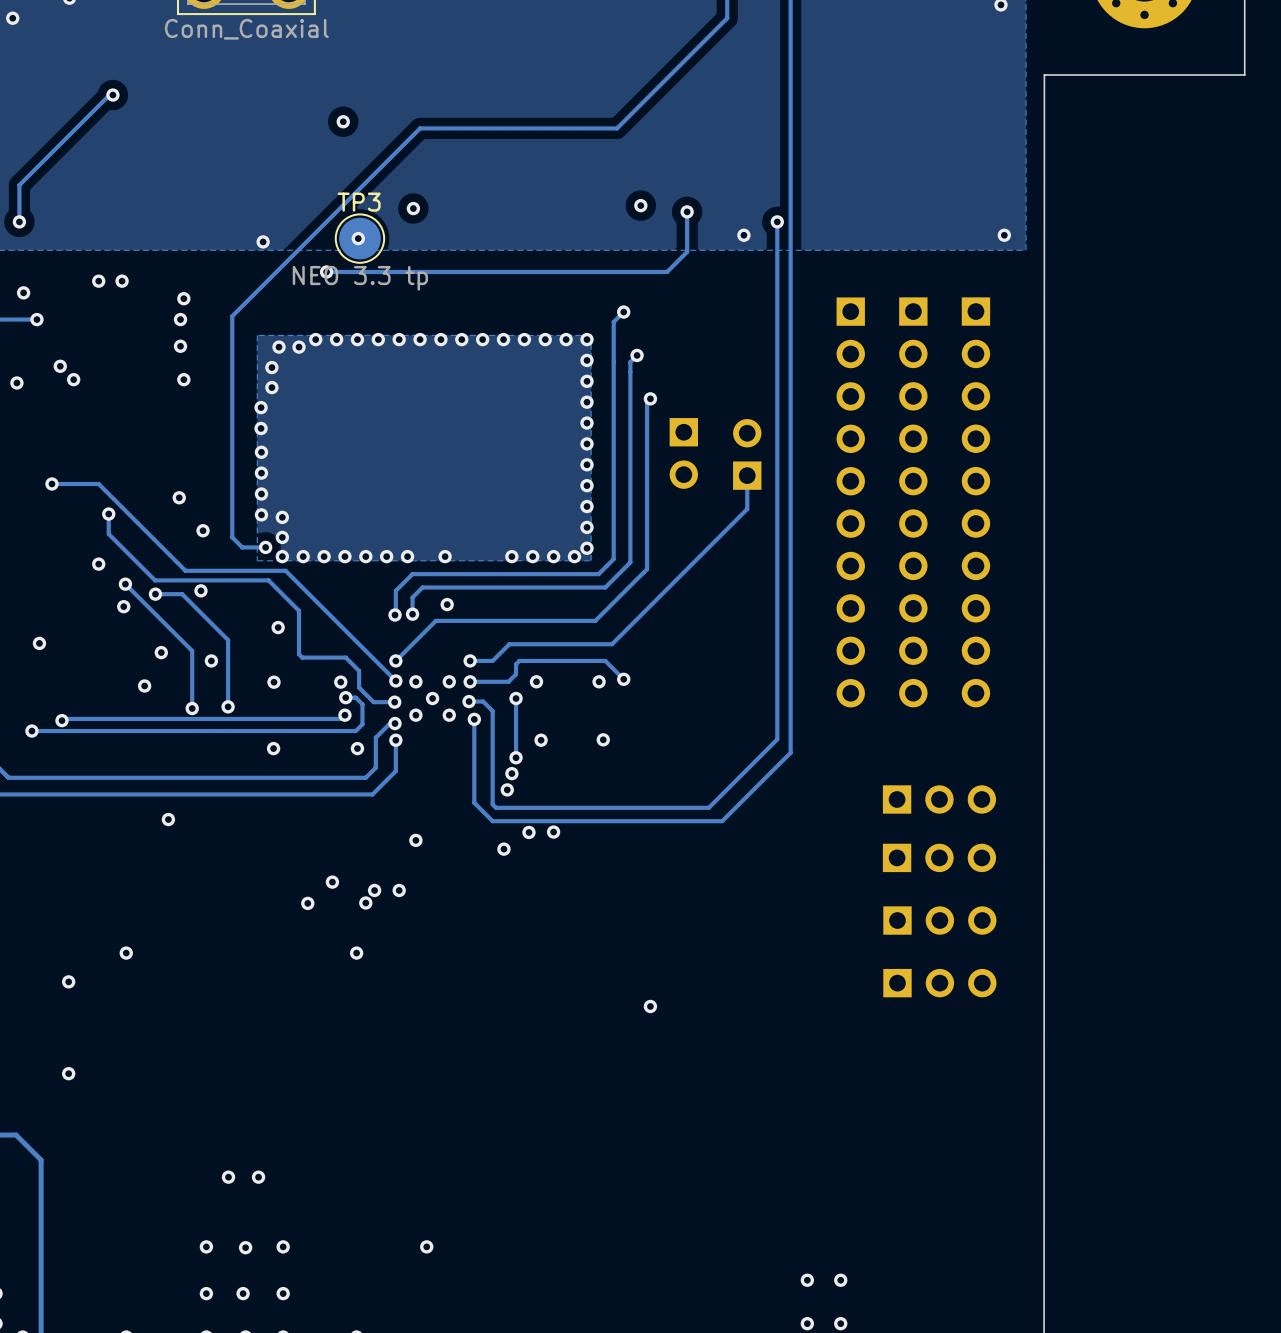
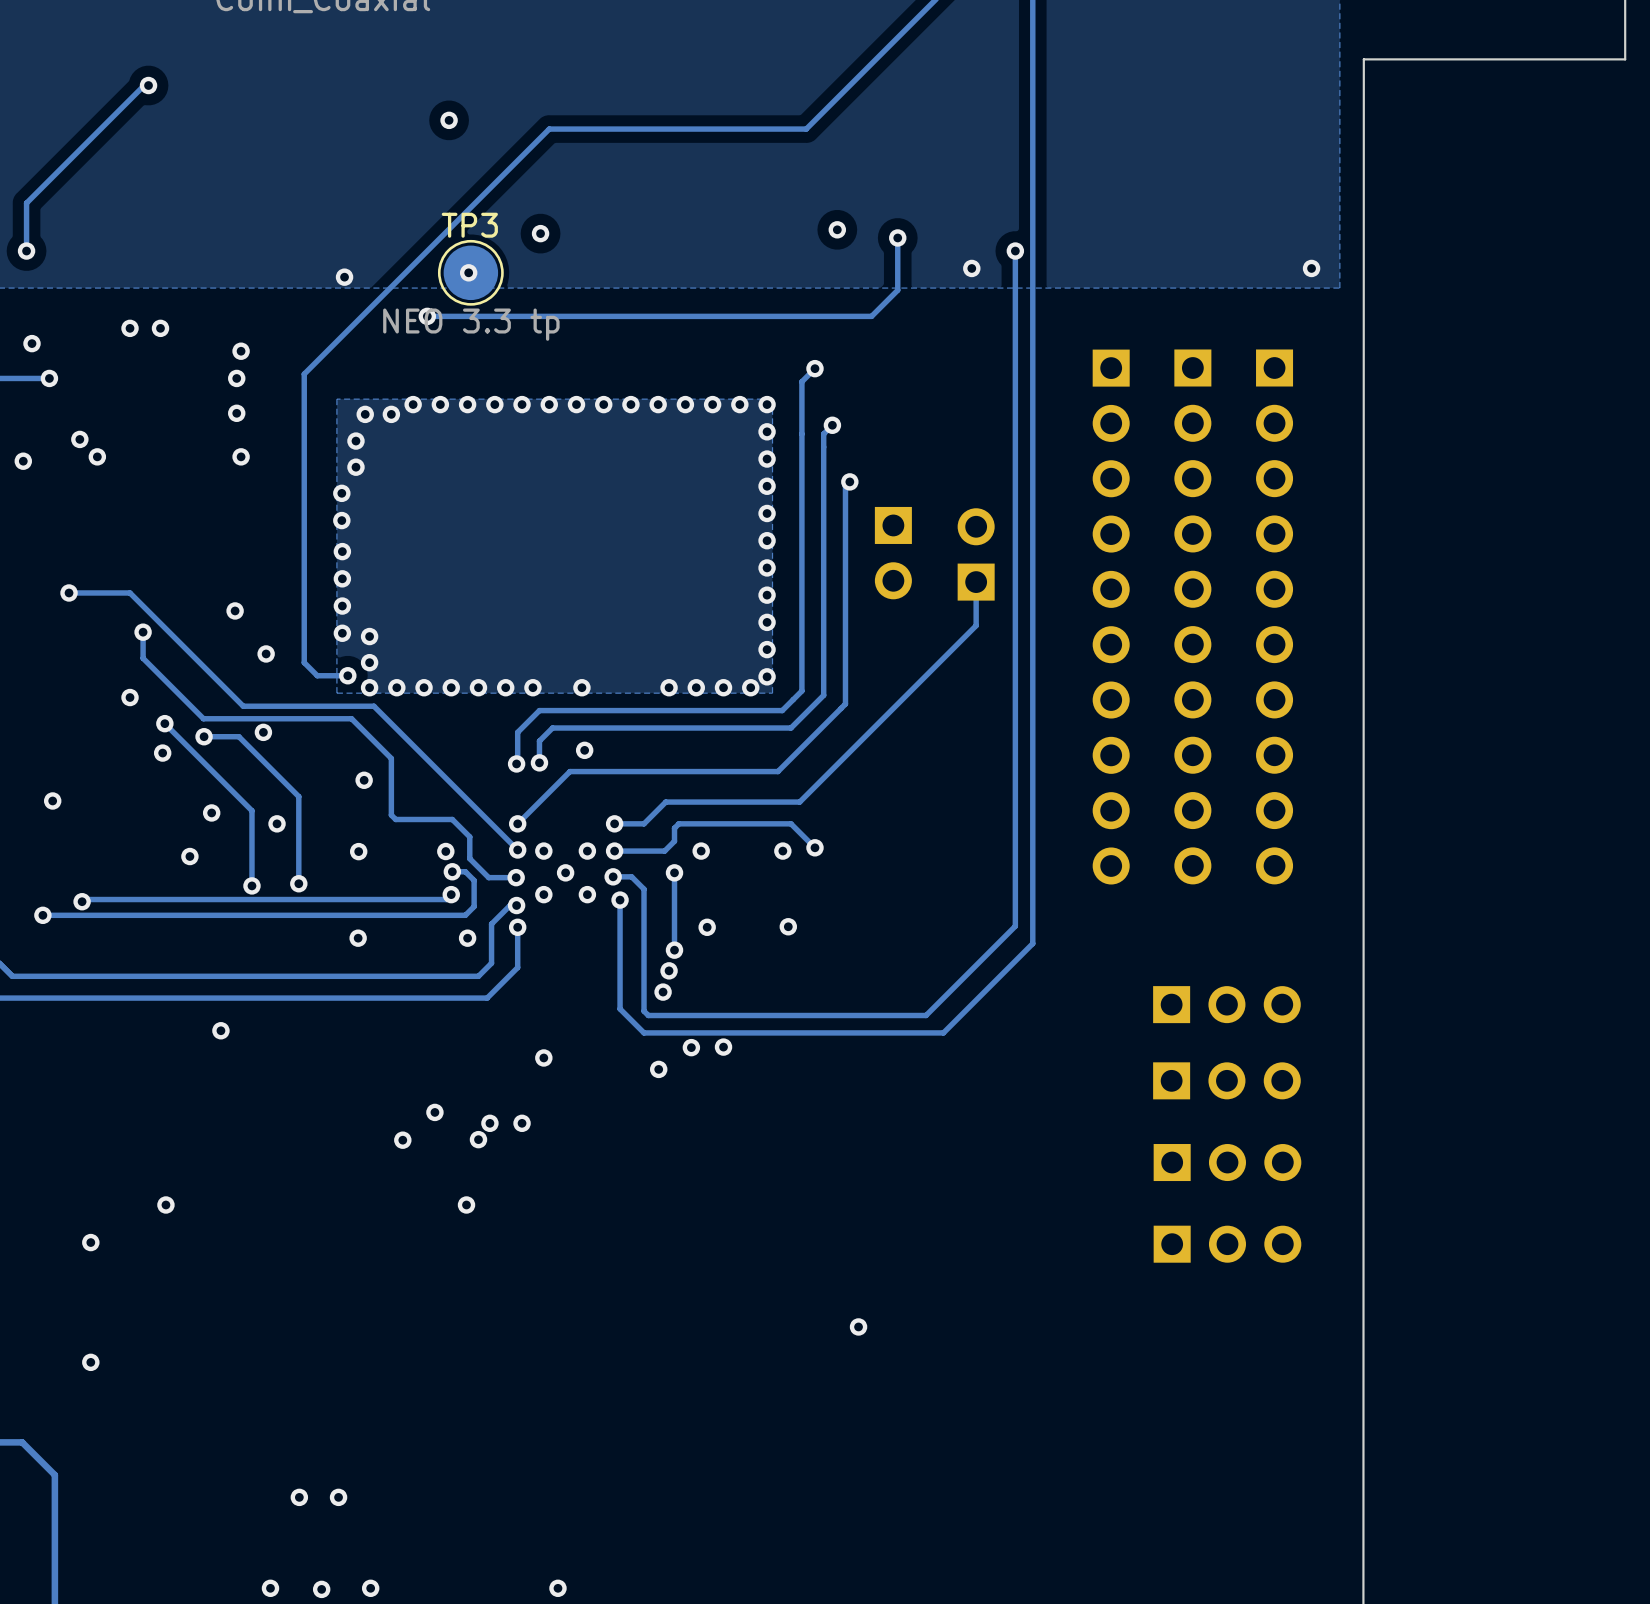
via position: (650, 1006) -> (858, 1326)

